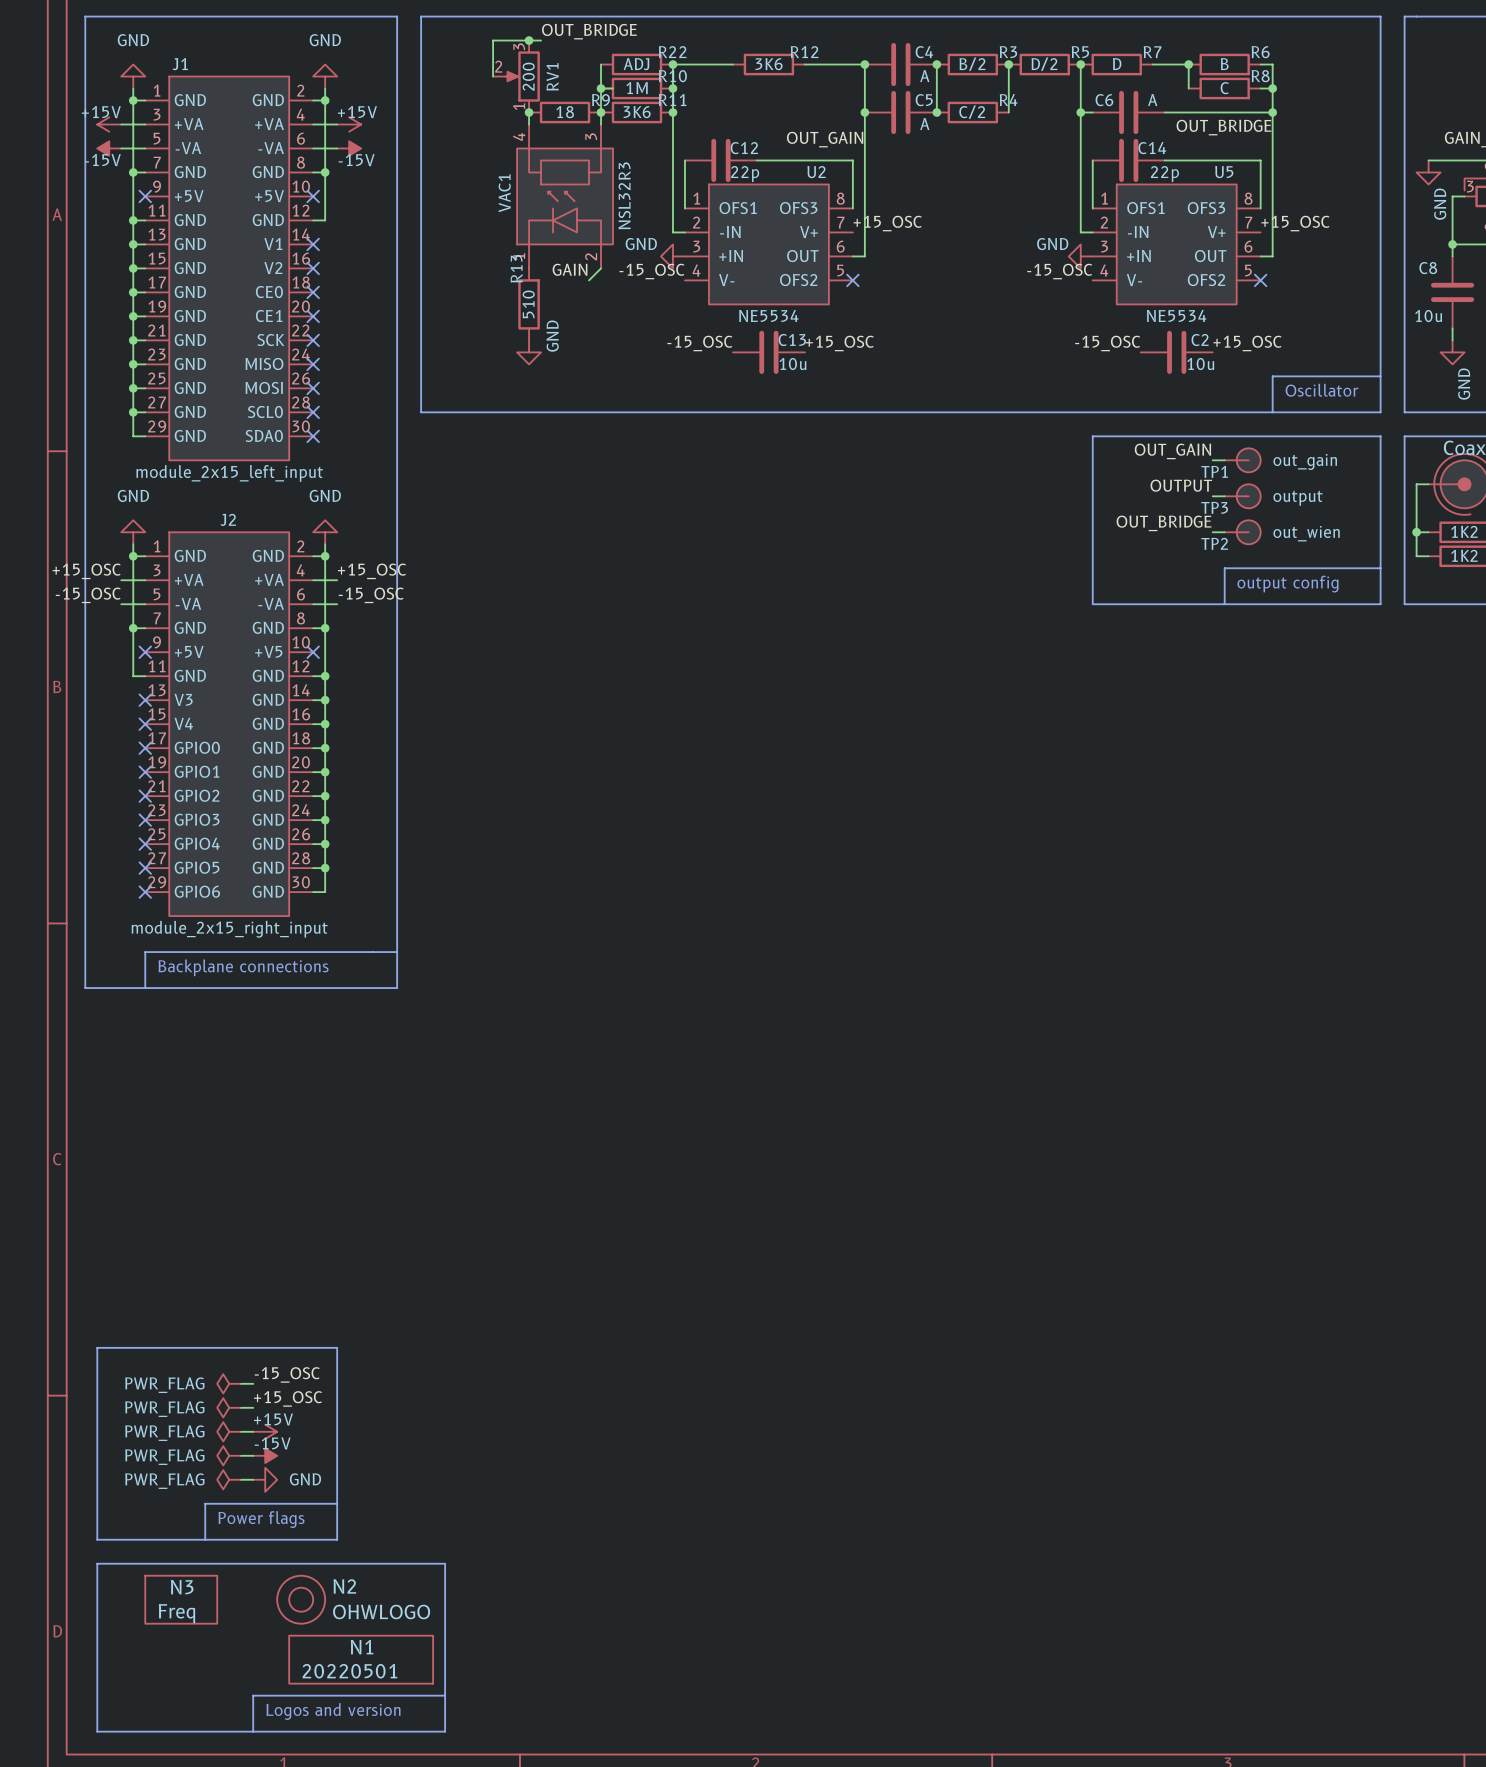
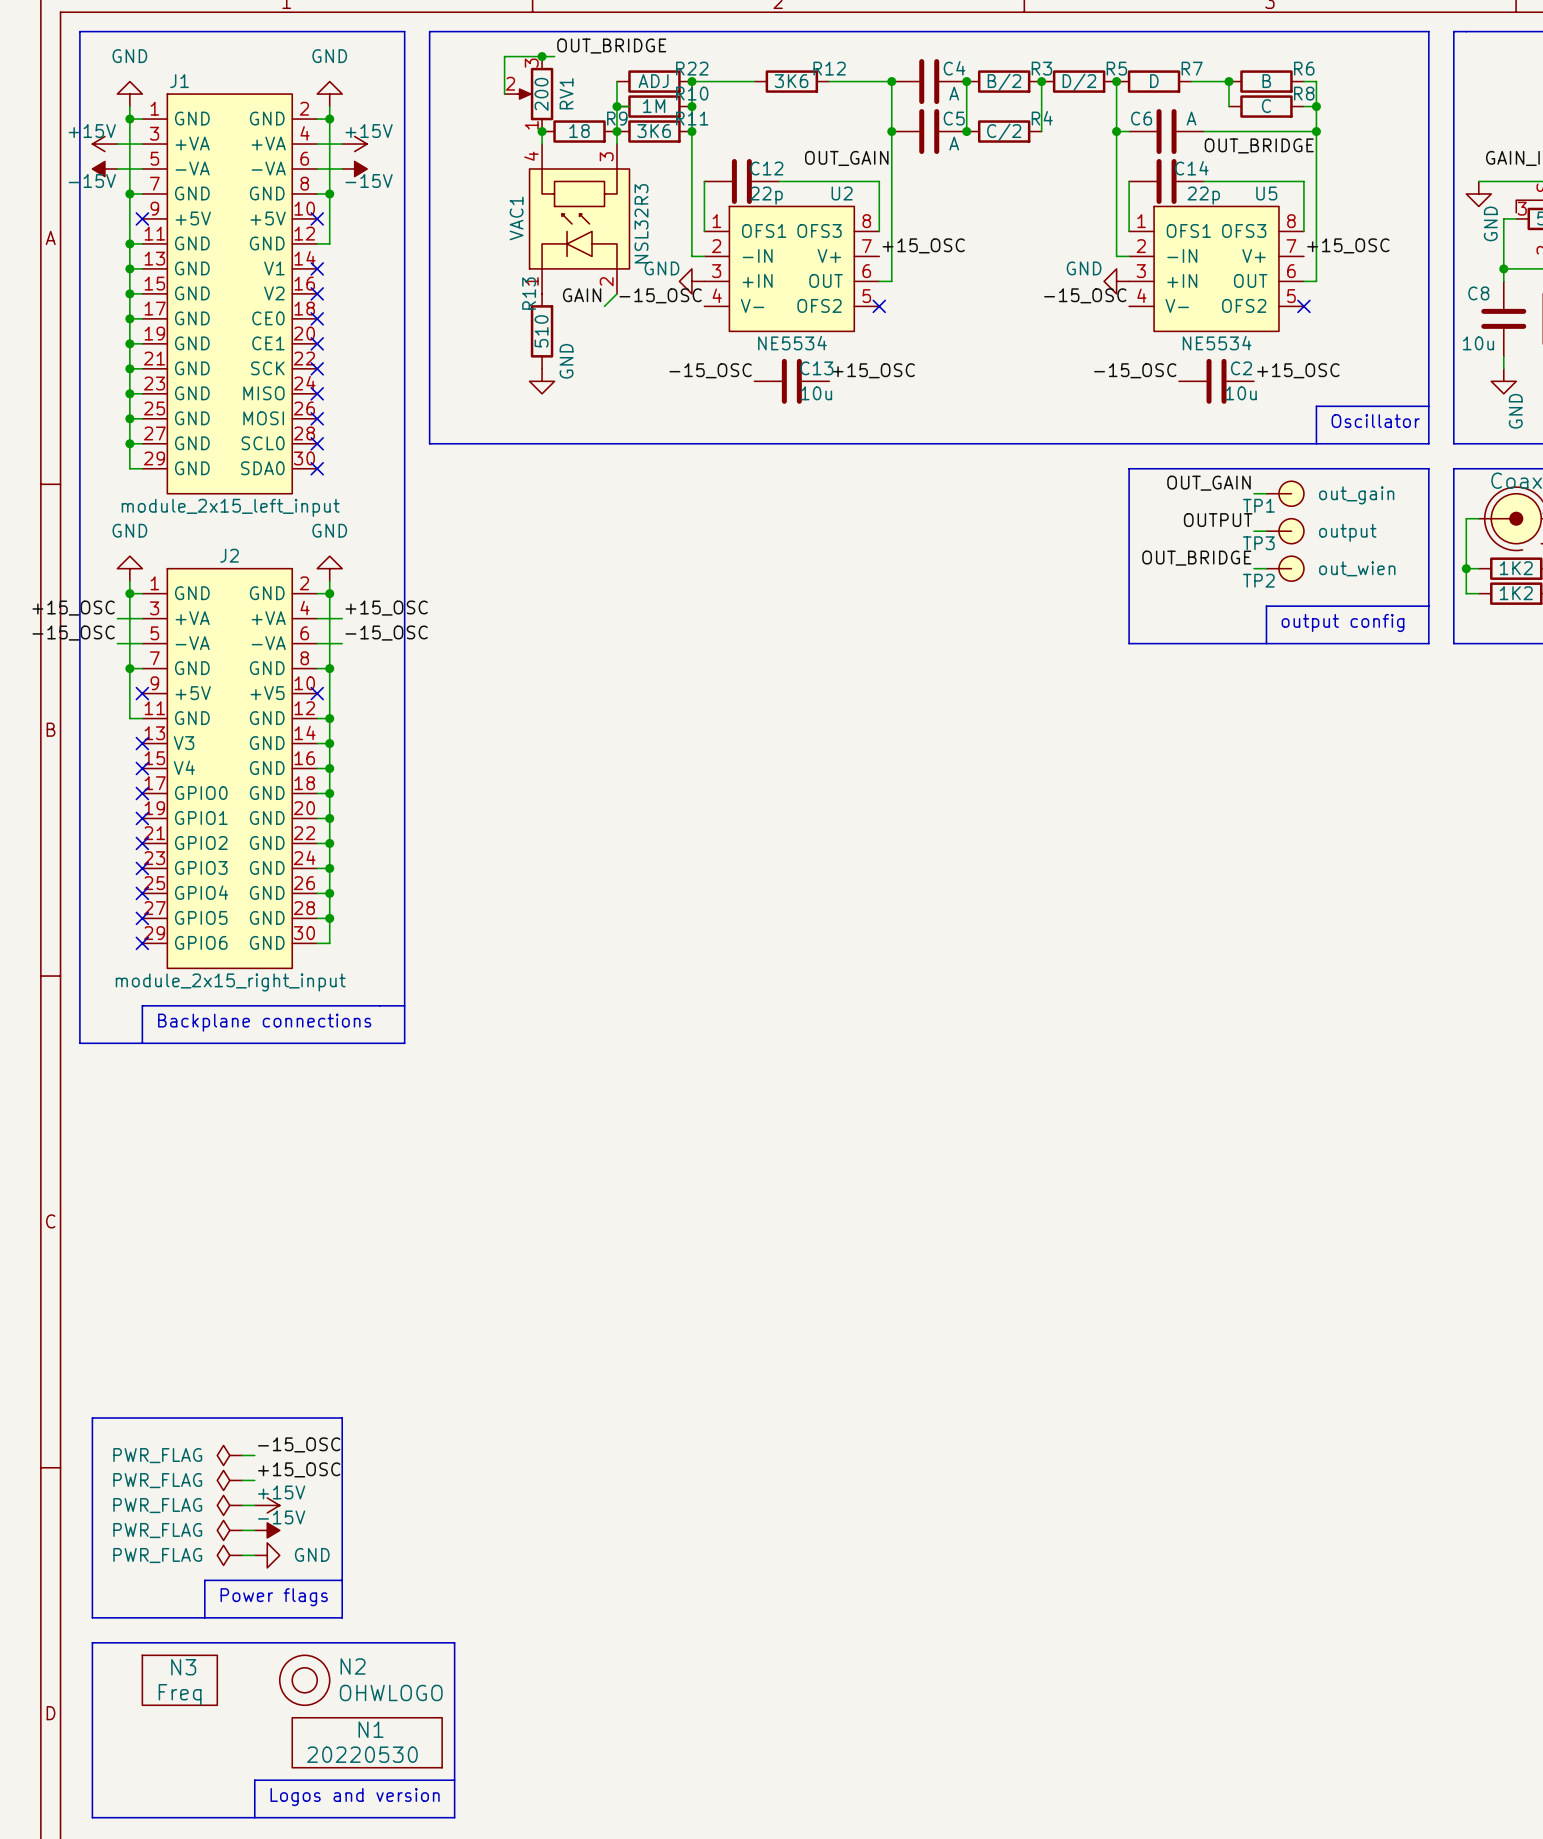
N1 value: 20220501 (349, 1671) -> 20220530 (362, 1754)

